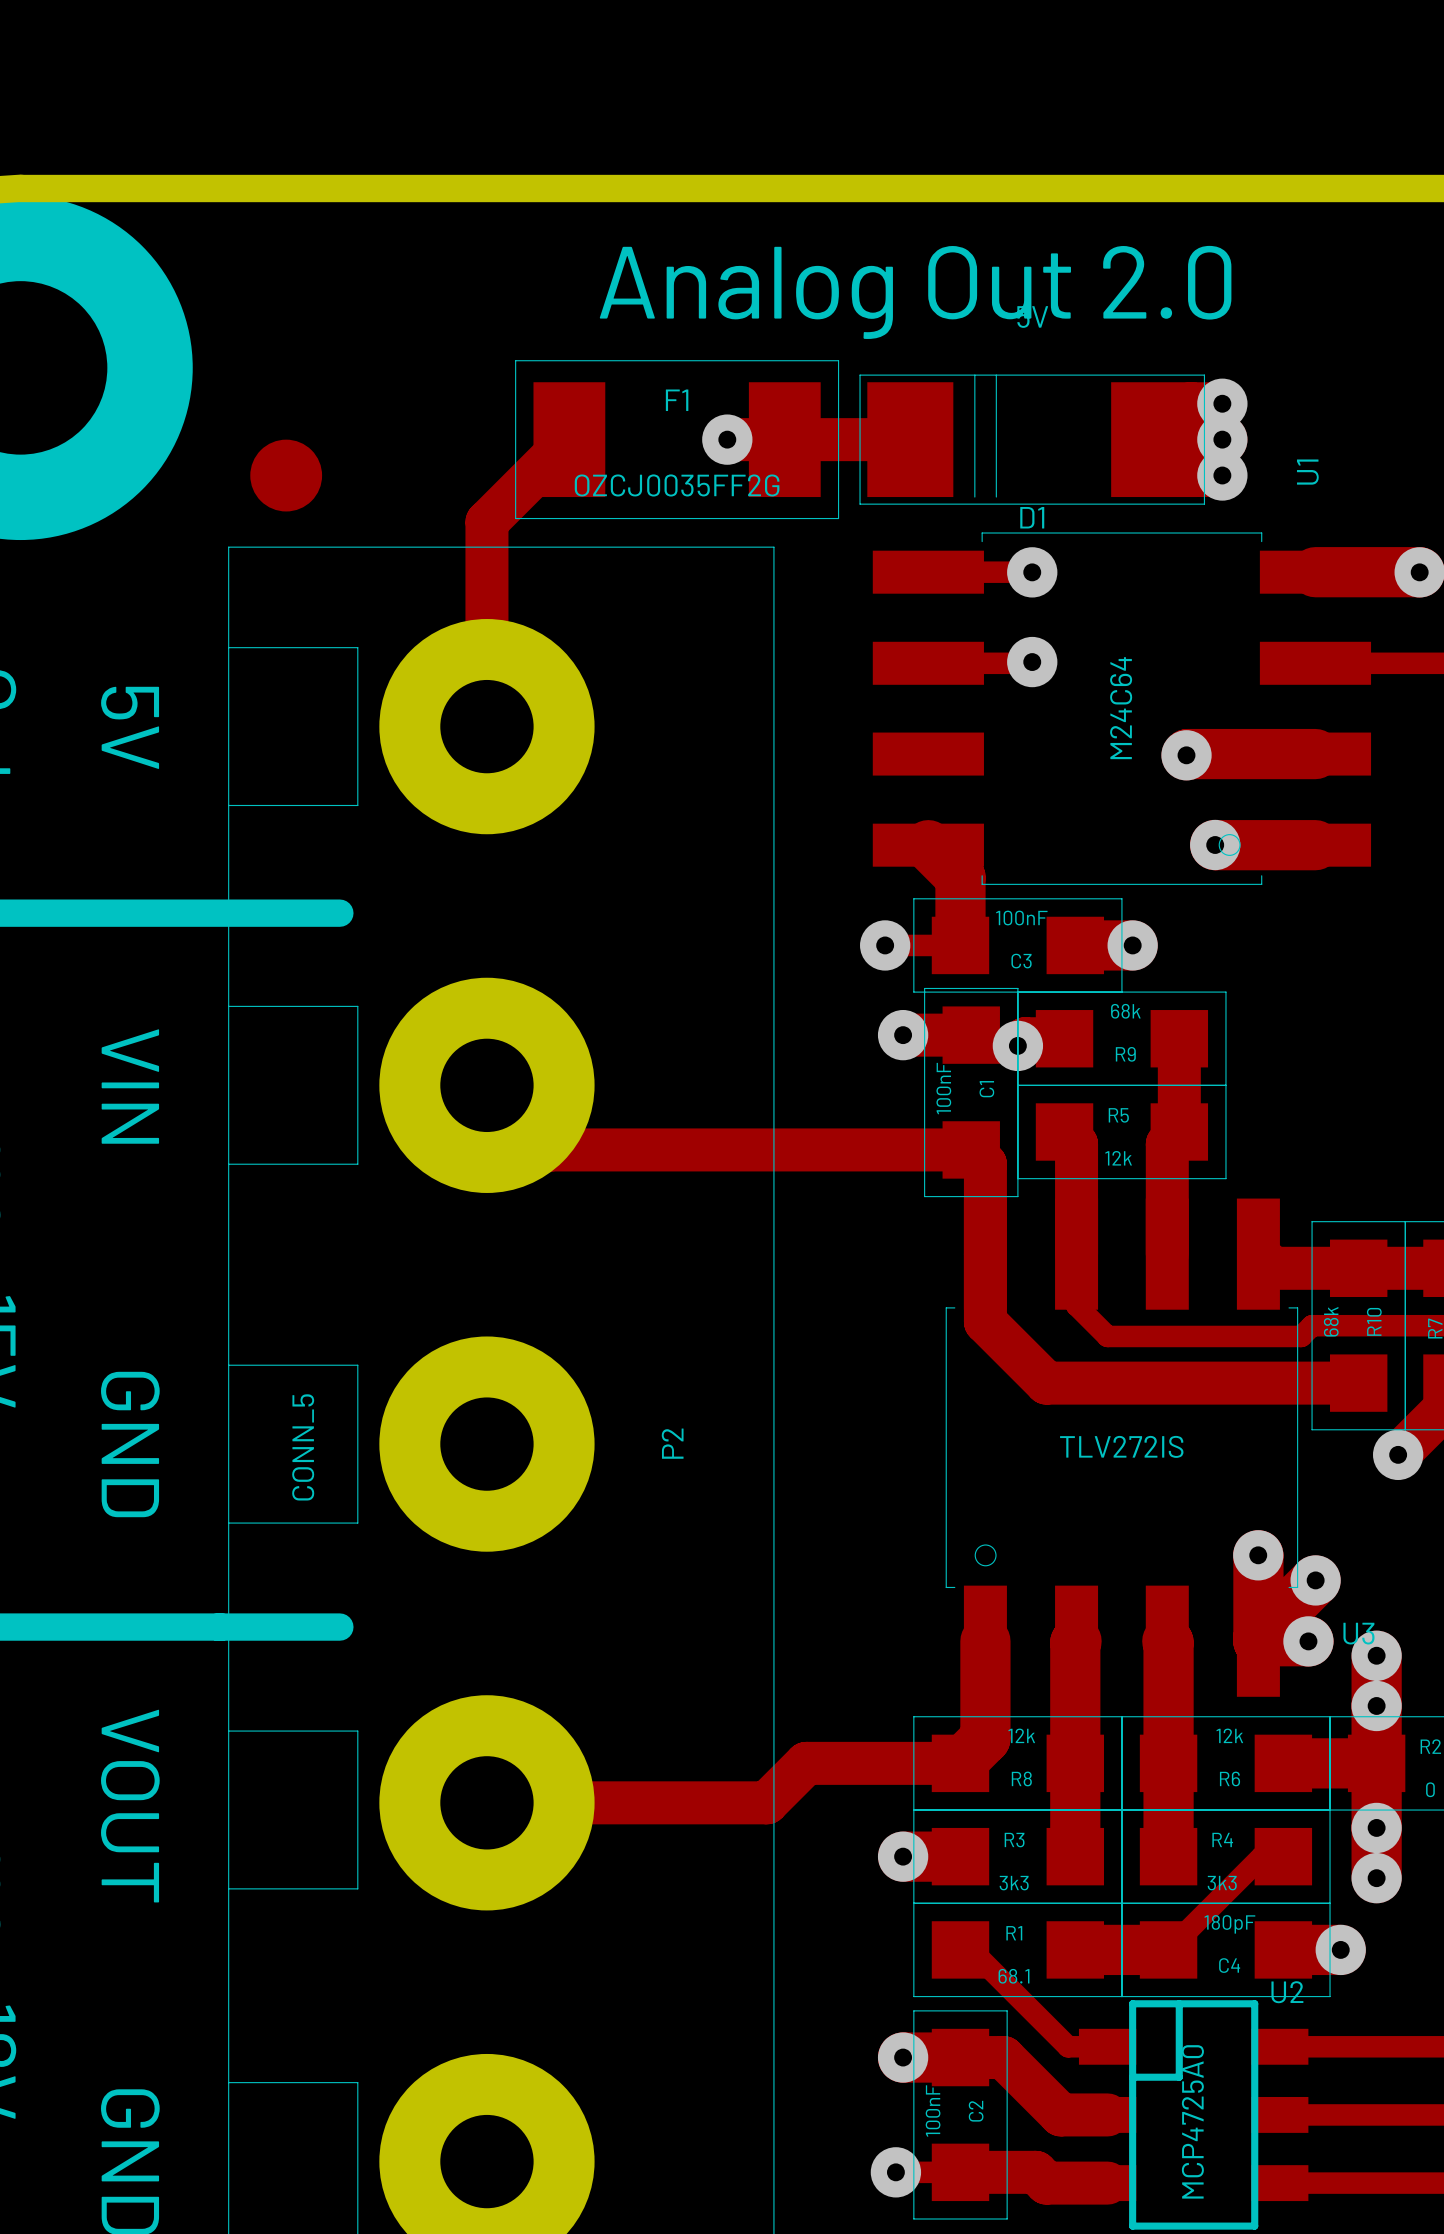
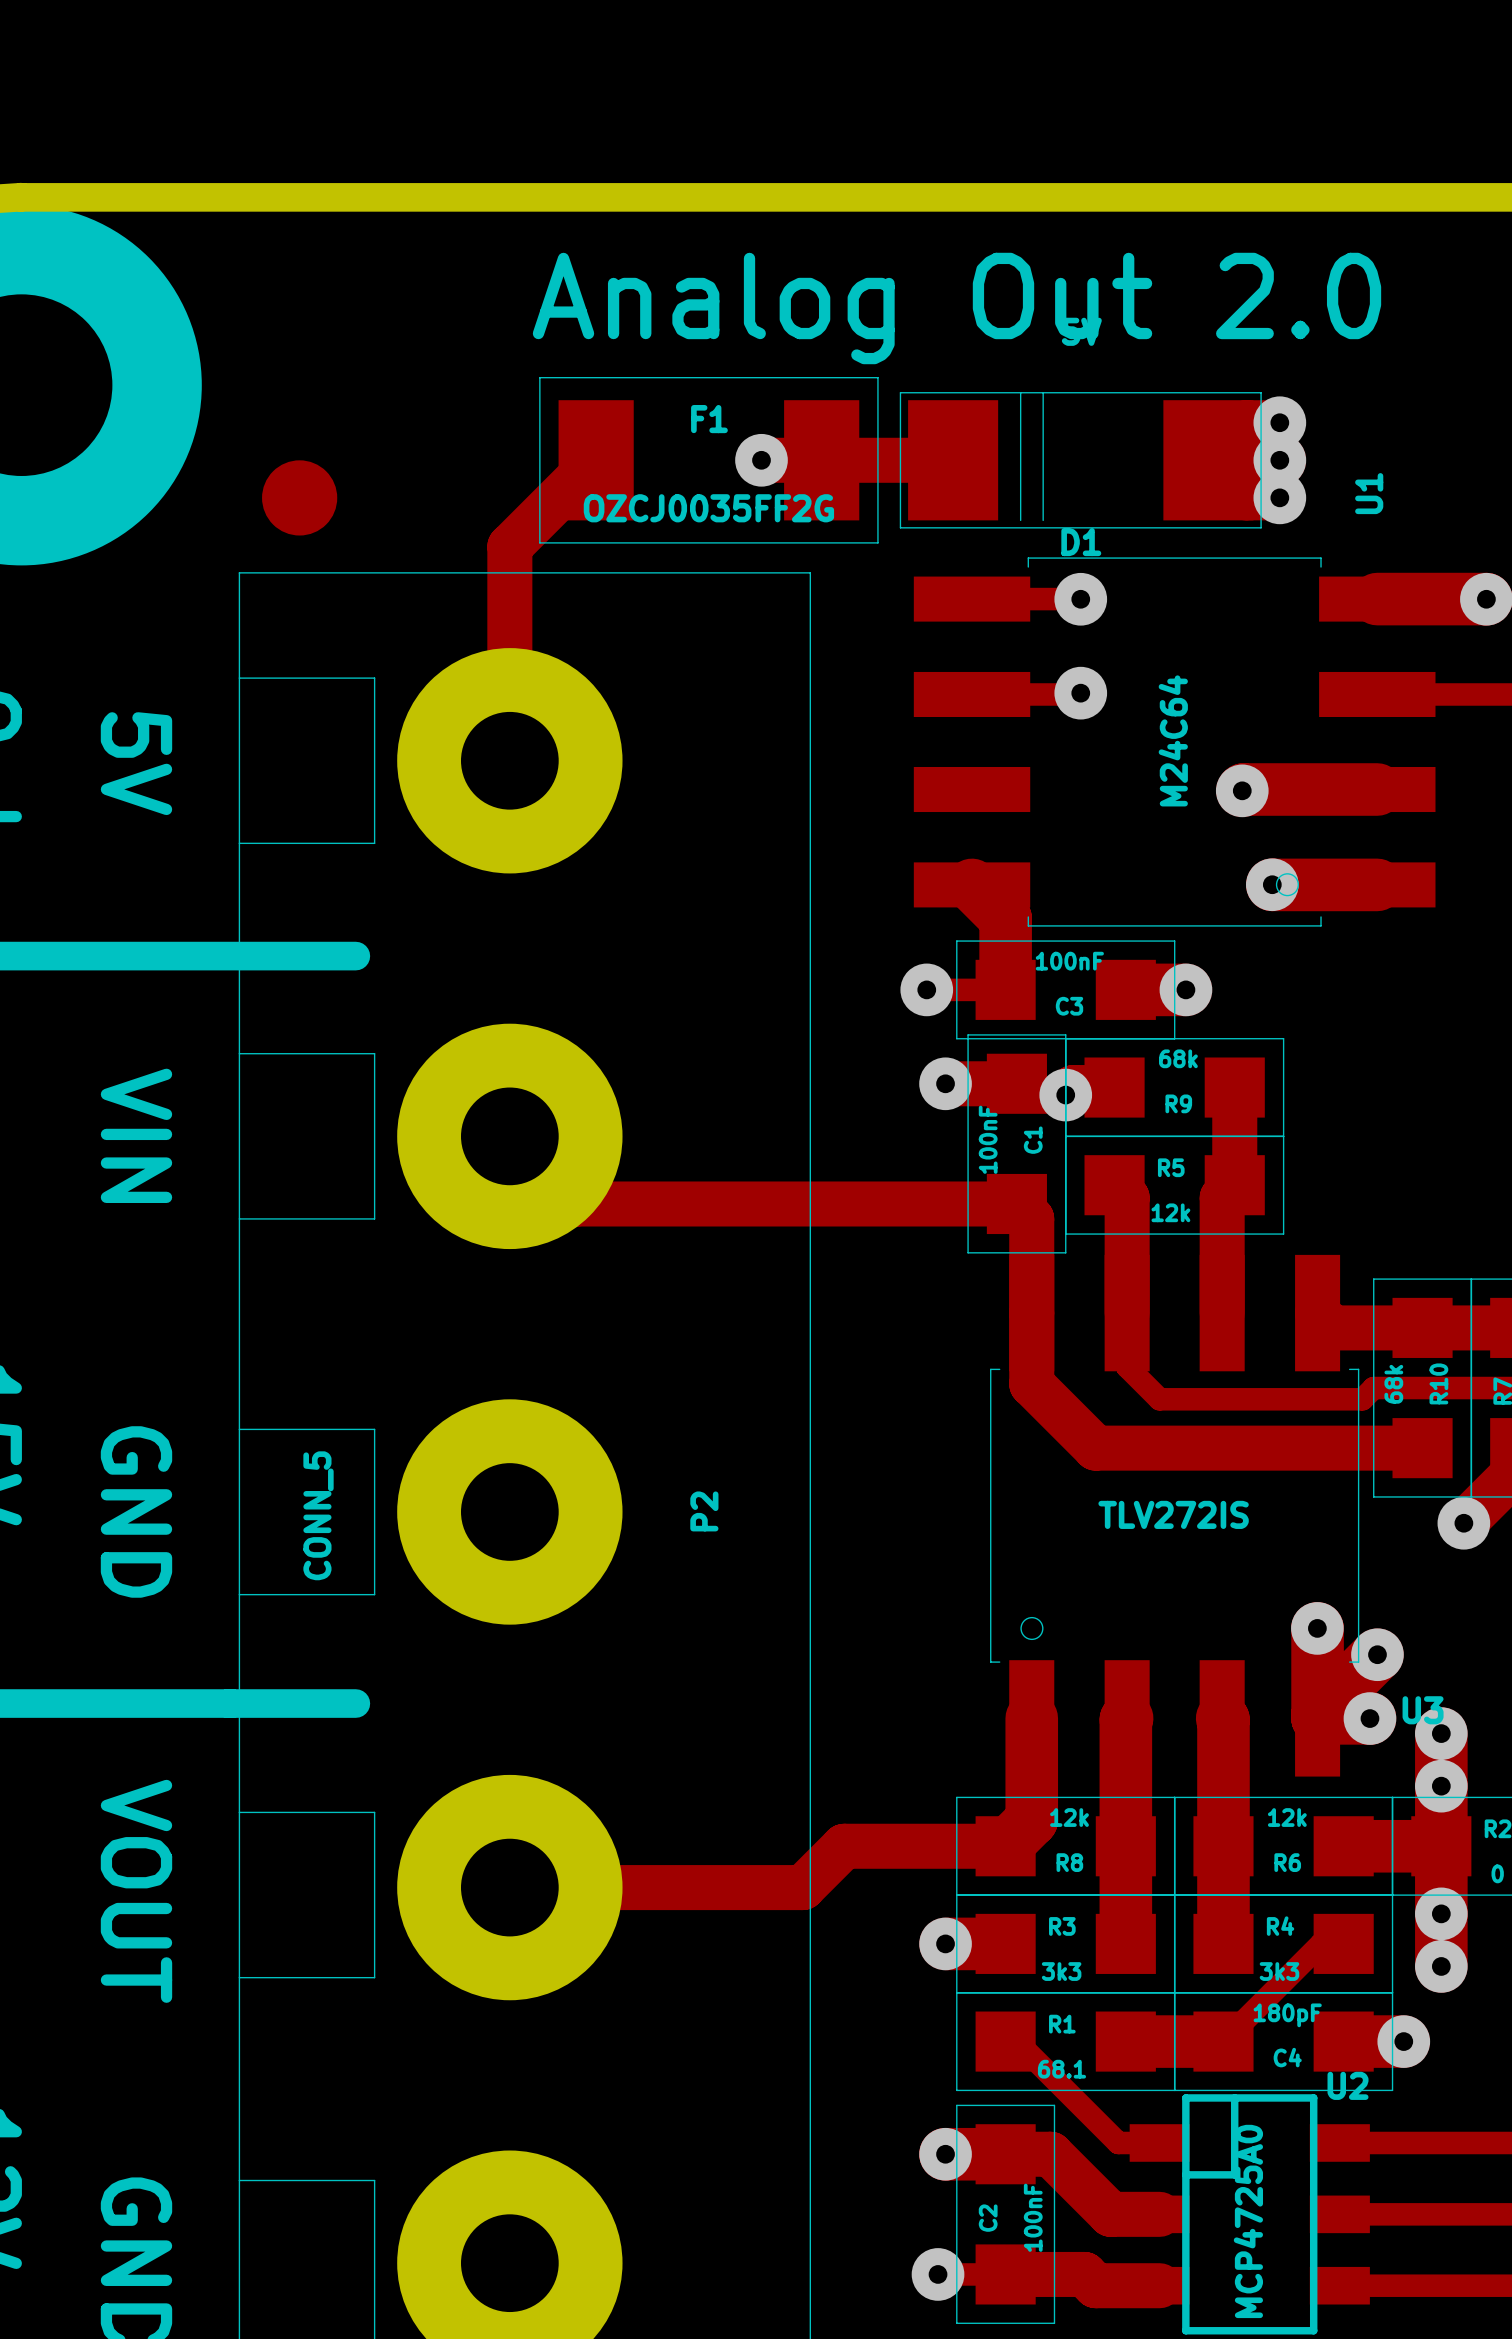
C2 value position: 100nF (933, 2110) -> 100nF (1033, 2217)
C2 name position: C2 (976, 2111) -> C2 (988, 2218)

